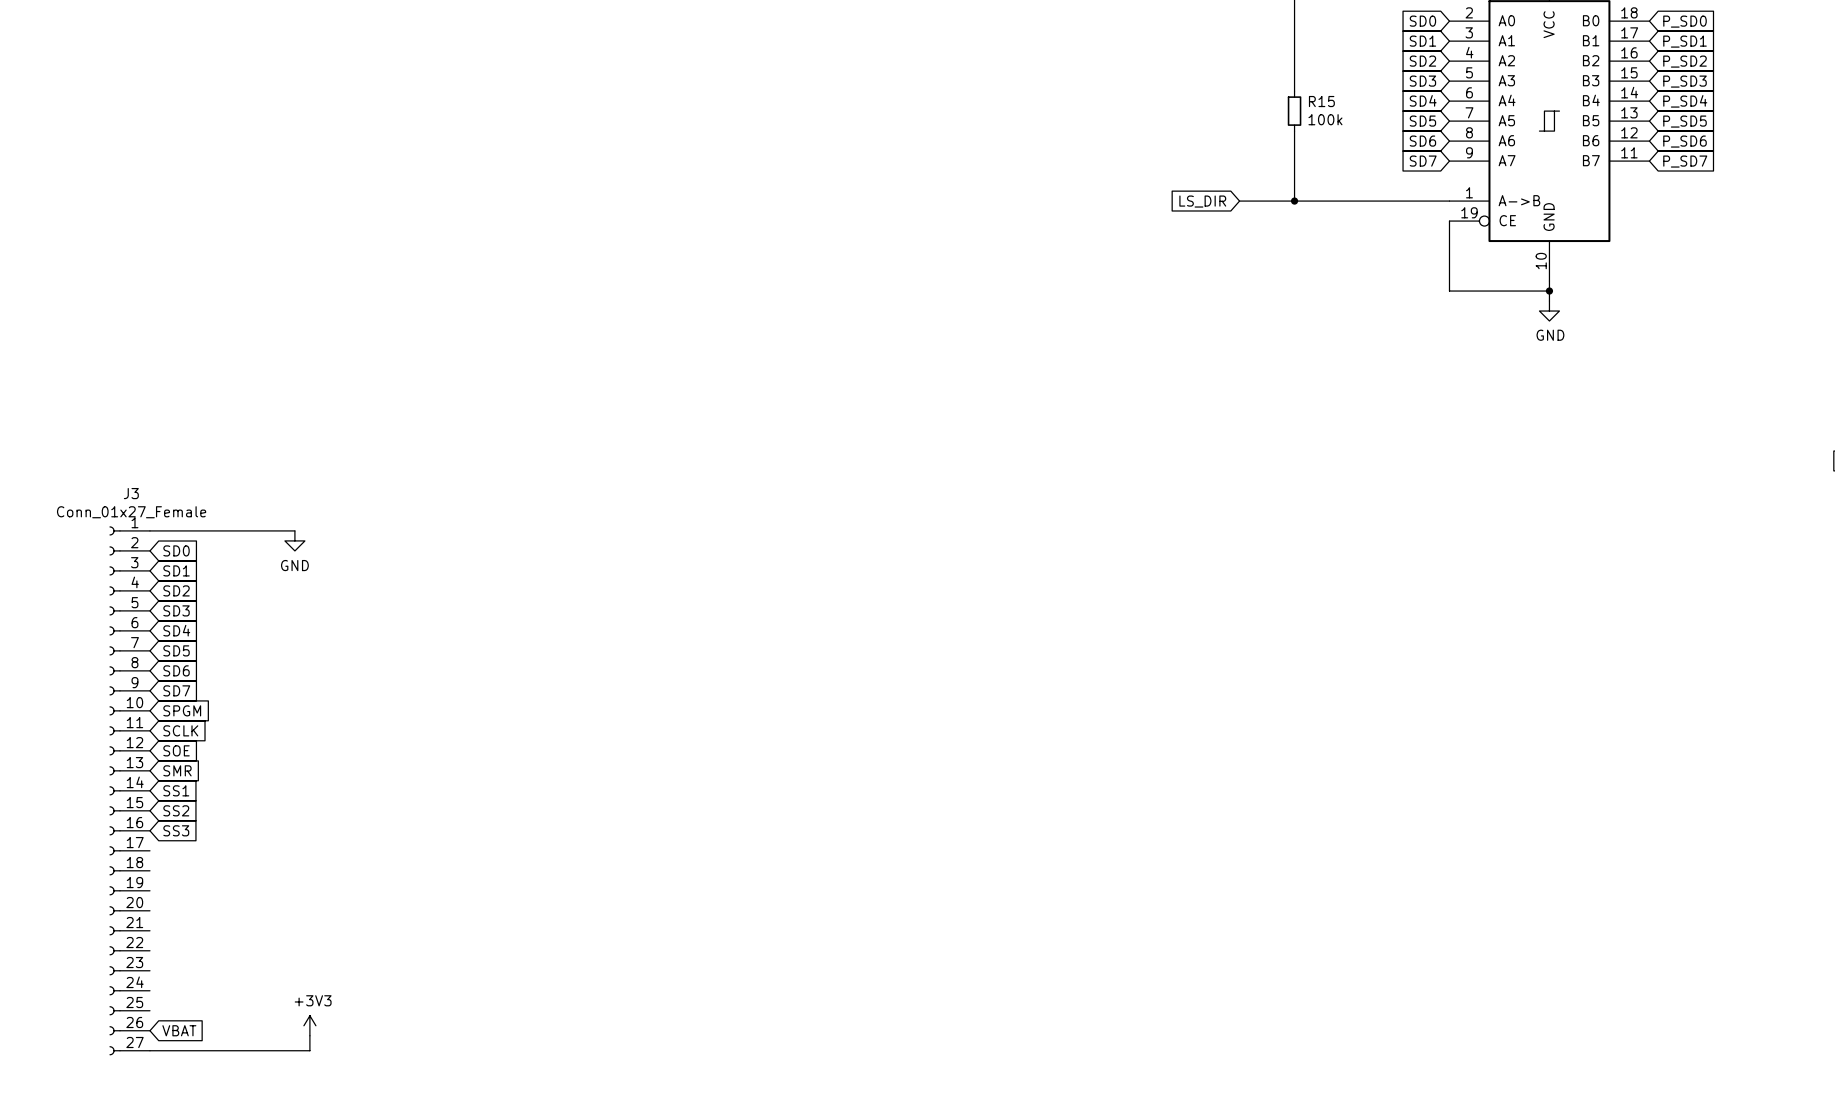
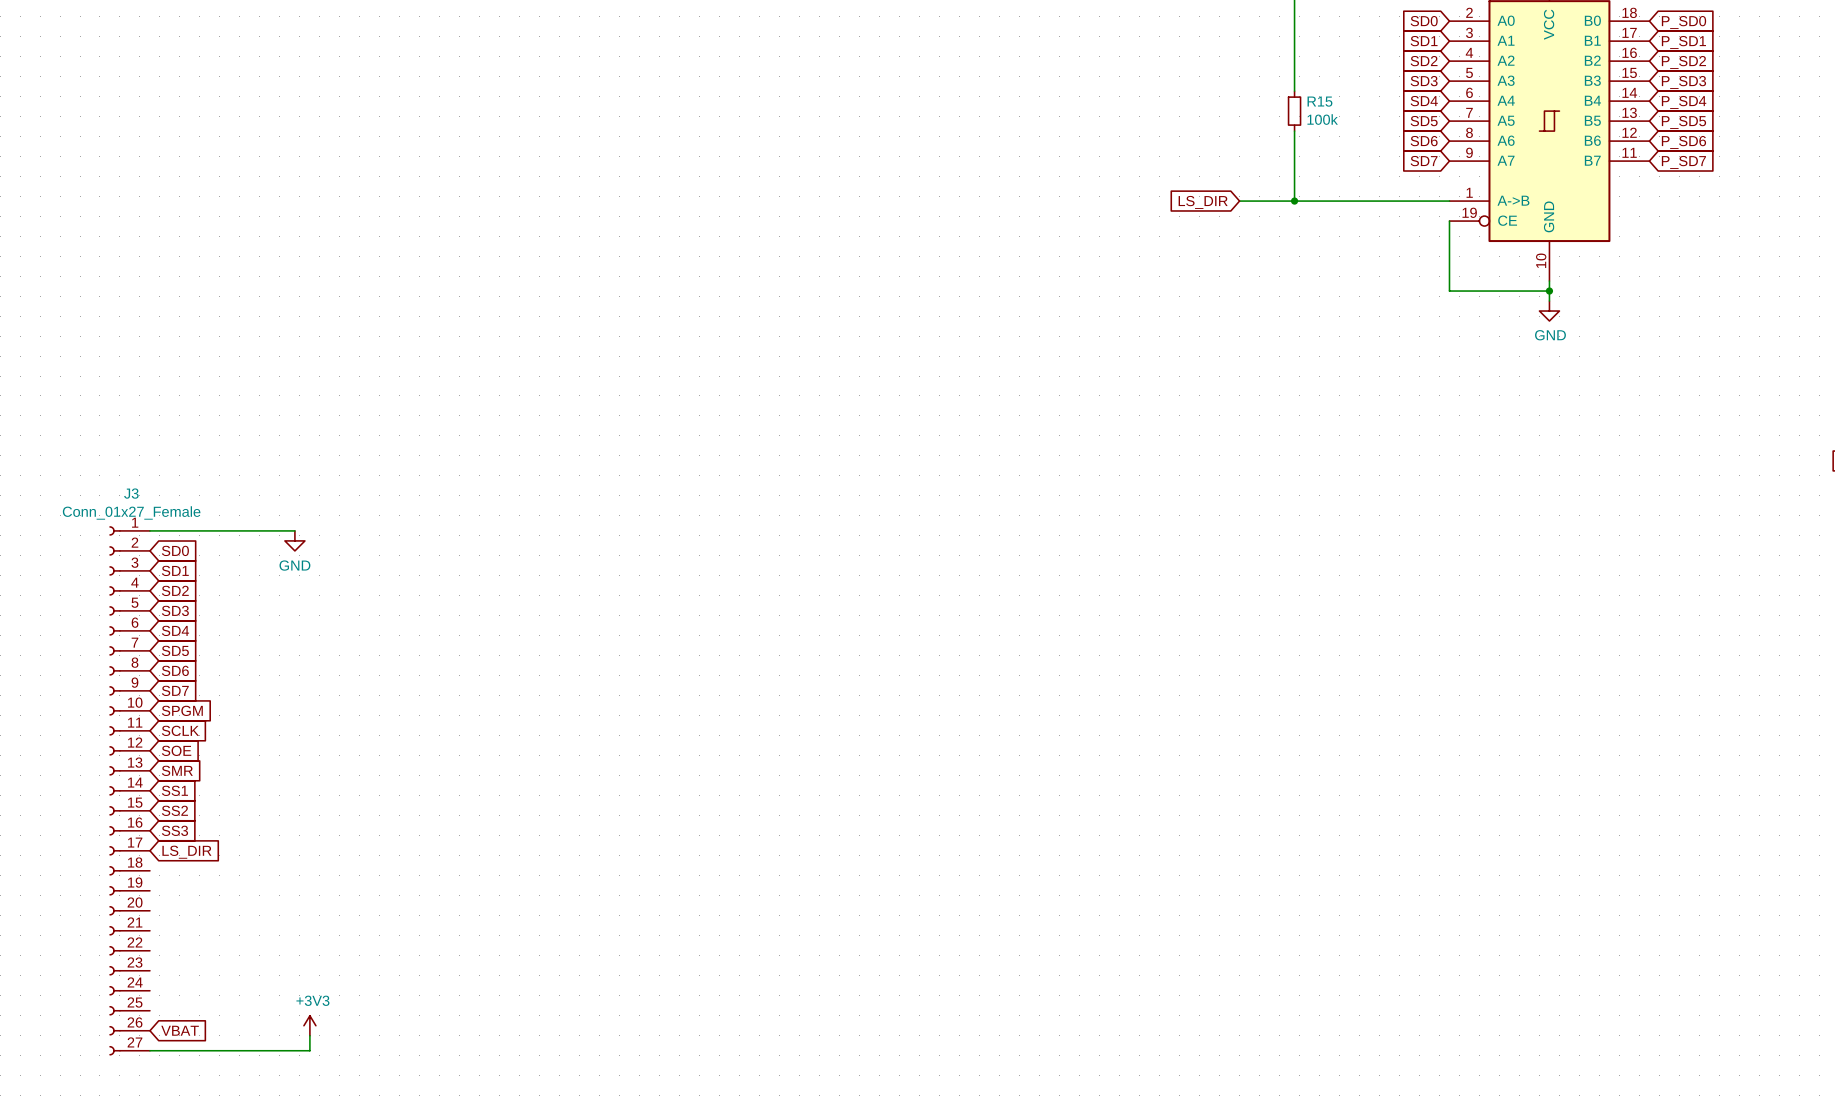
global label: none -> LS_DIR (186, 852)

